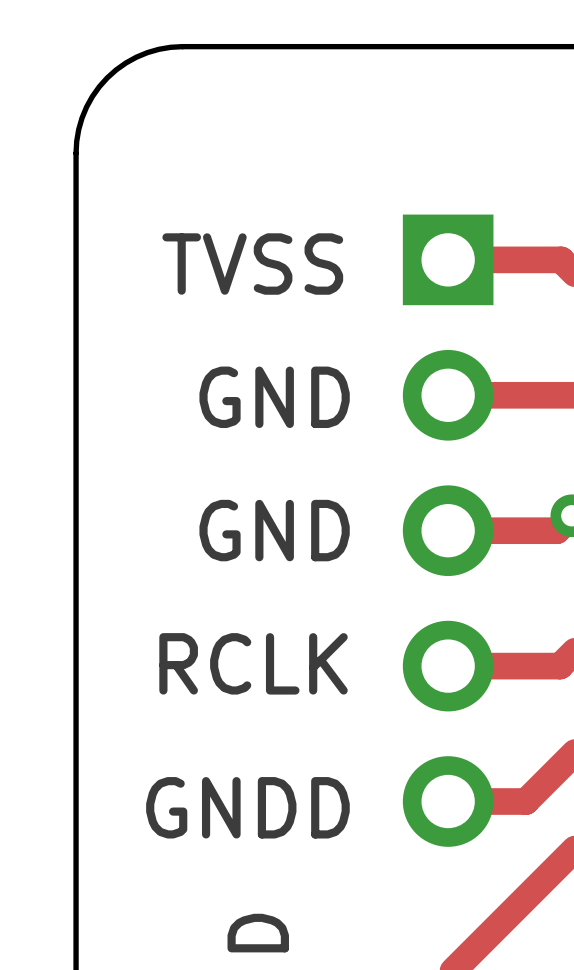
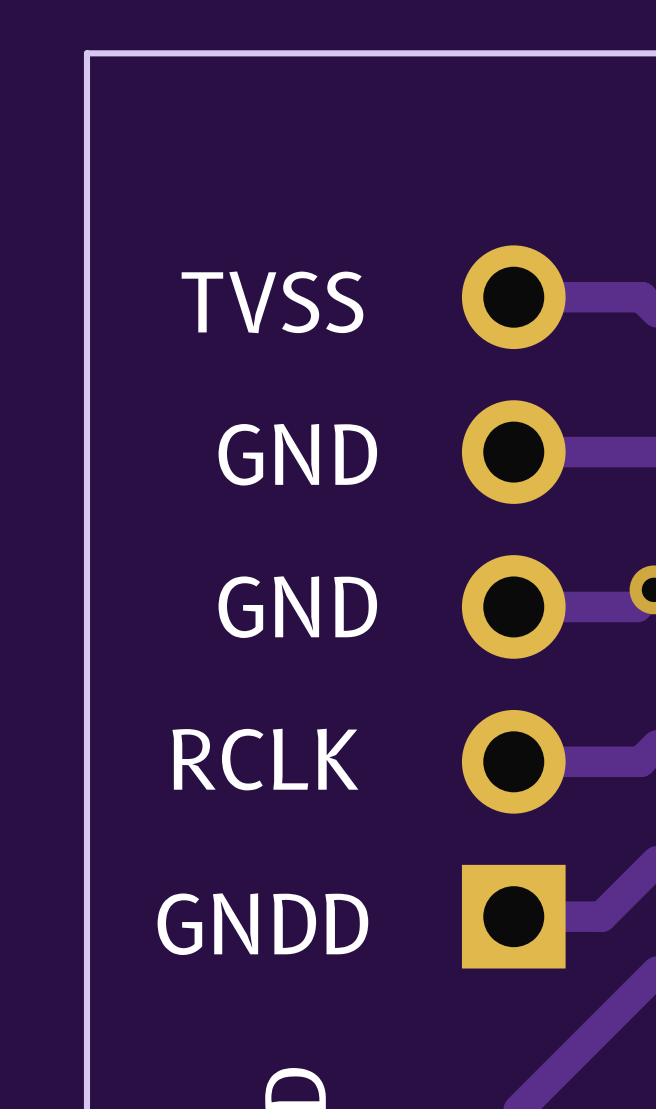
board edge: (182, 46) (147, 52) (125, 62) (107, 77) (92, 96) (82, 118) (76, 153) -> (208, 53) (86, 53) (86, 175)
part rotation: 0° (448, 530) -> 180° (513, 606)

